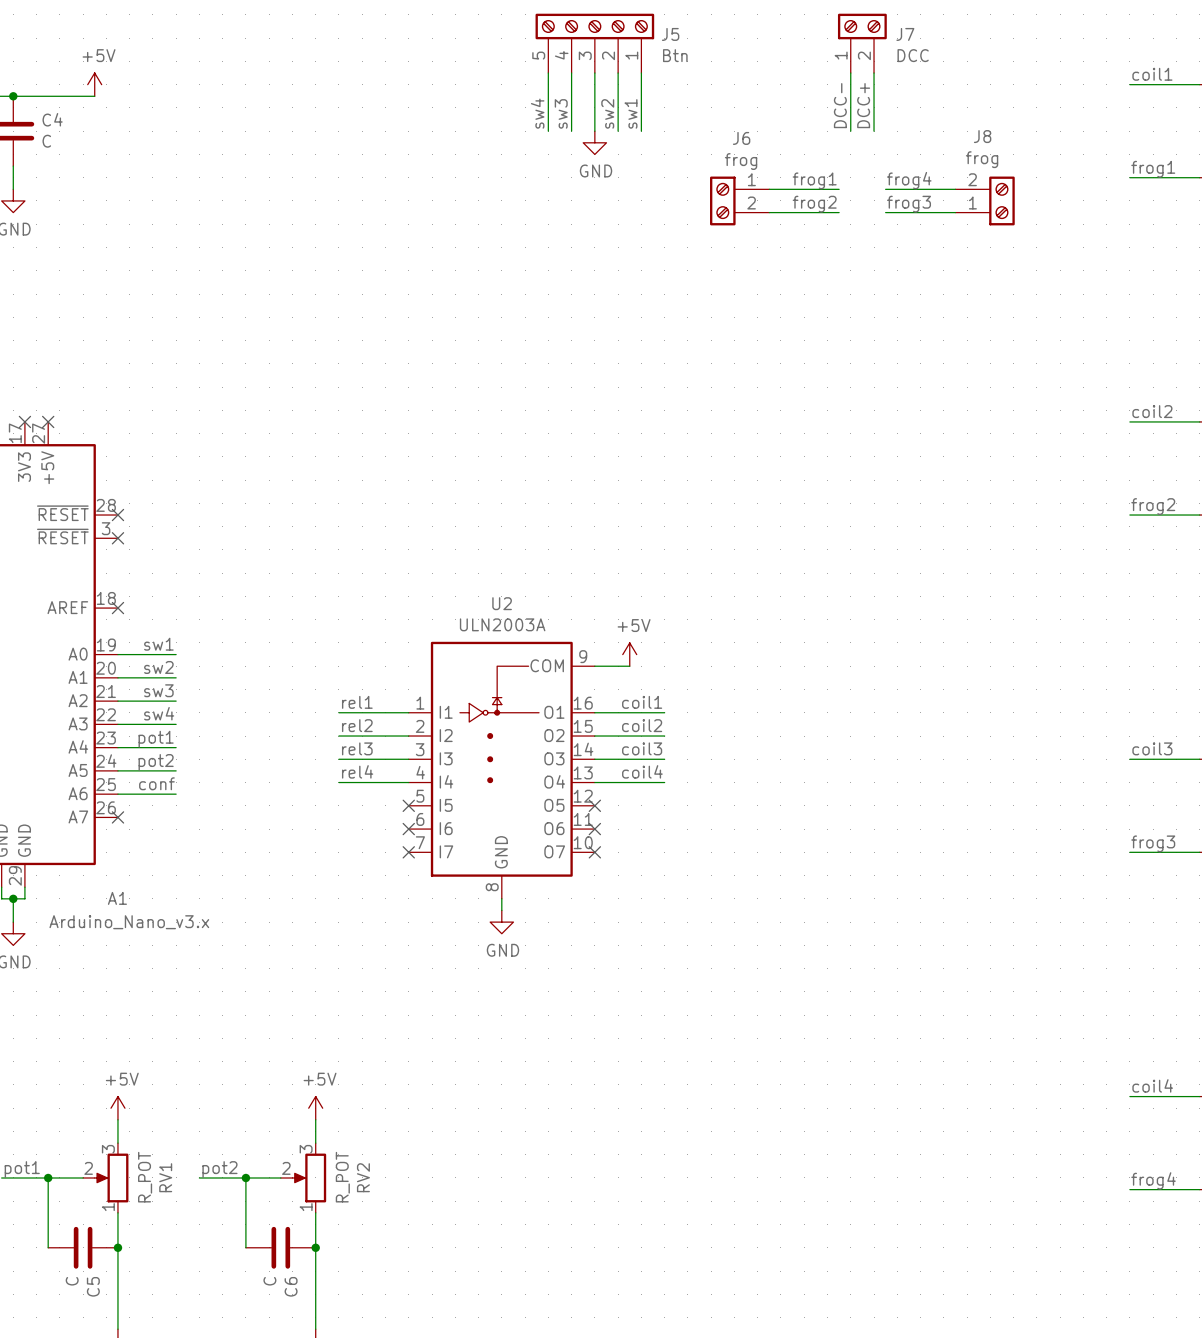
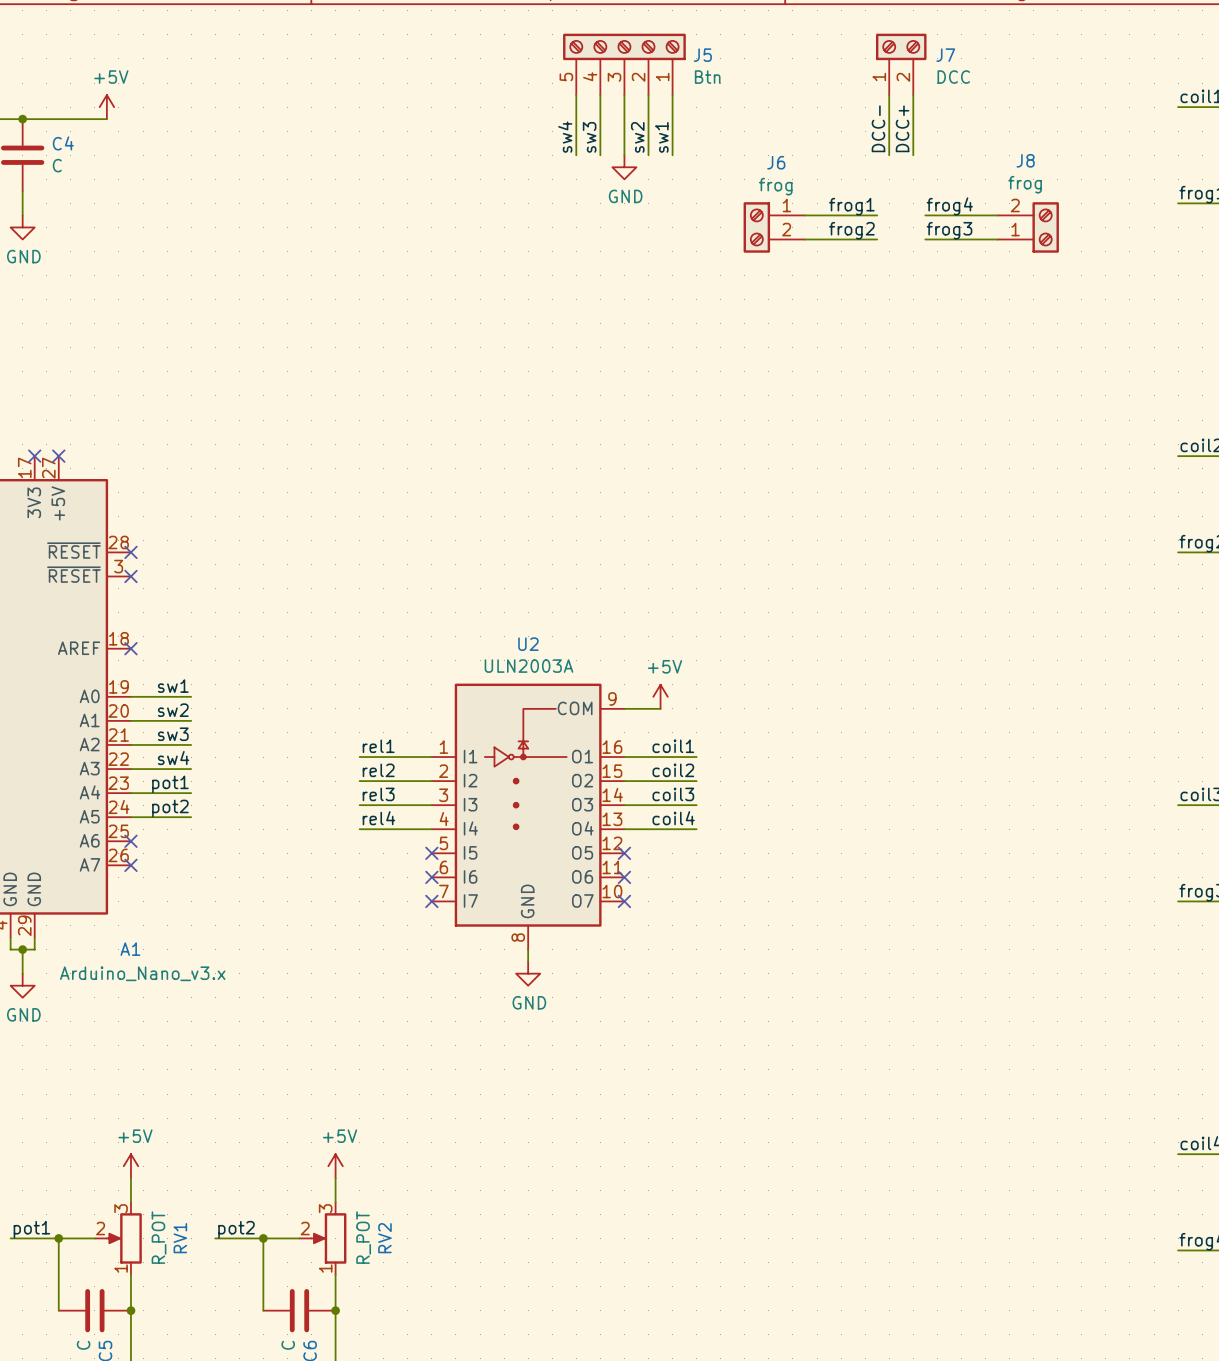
label: conf (156, 783) -> none
wire: (117, 794) (176, 794) -> none
no-connect mark: none -> (130, 841)

